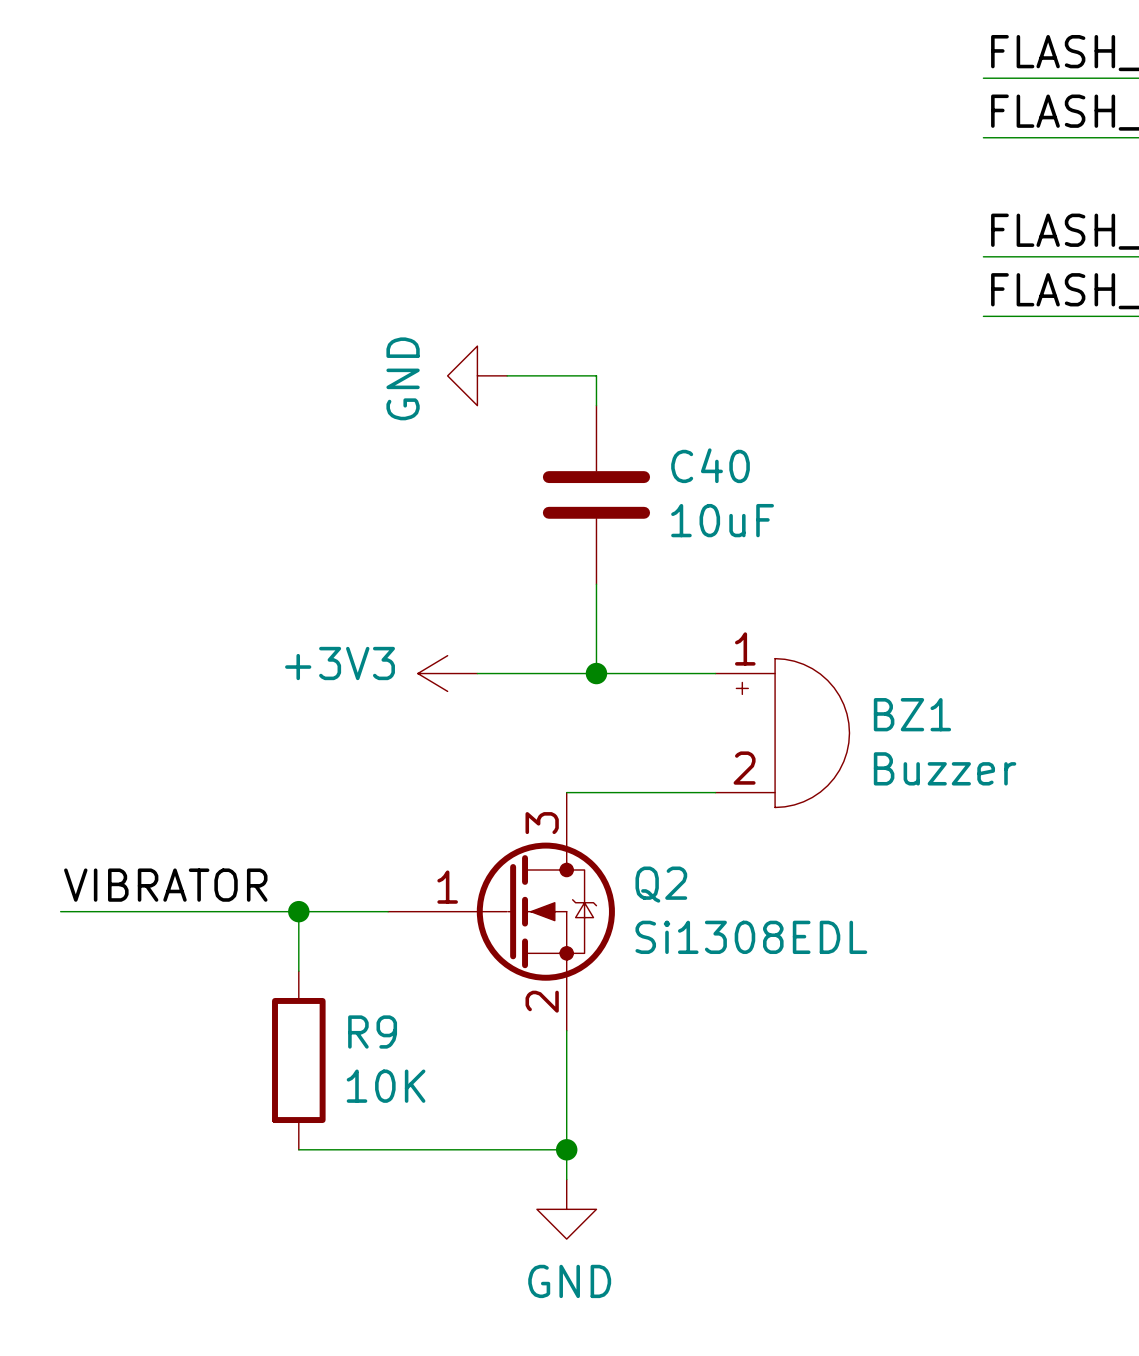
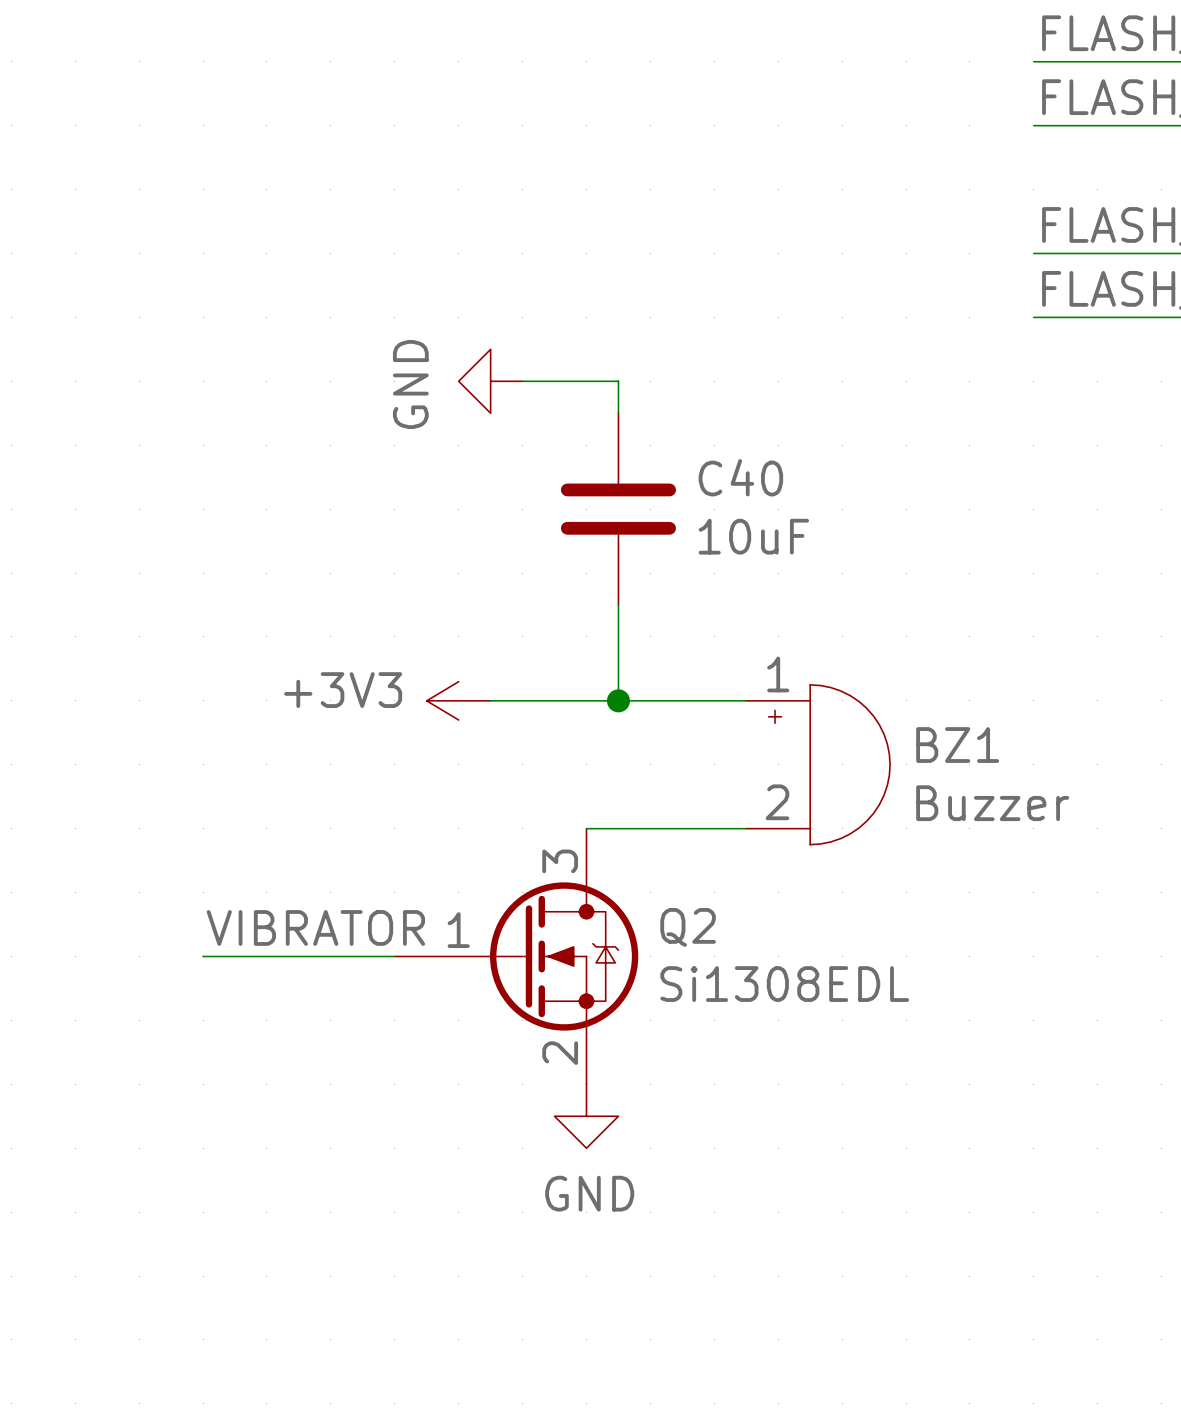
label position: VIBRATOR (165, 885) -> VIBRATOR (315, 927)
wire: (60, 911) (209, 911) -> none
wire: (298, 911) (298, 971) -> none
junction: (298, 911) -> none
wire: (566, 1030) (566, 1179) -> none
R9: 10K (298, 1060) -> none
wire: (298, 1149) (566, 1149) -> none
junction: (566, 1149) -> none
power symbol position: GND (566, 1209) -> GND (586, 1116)

